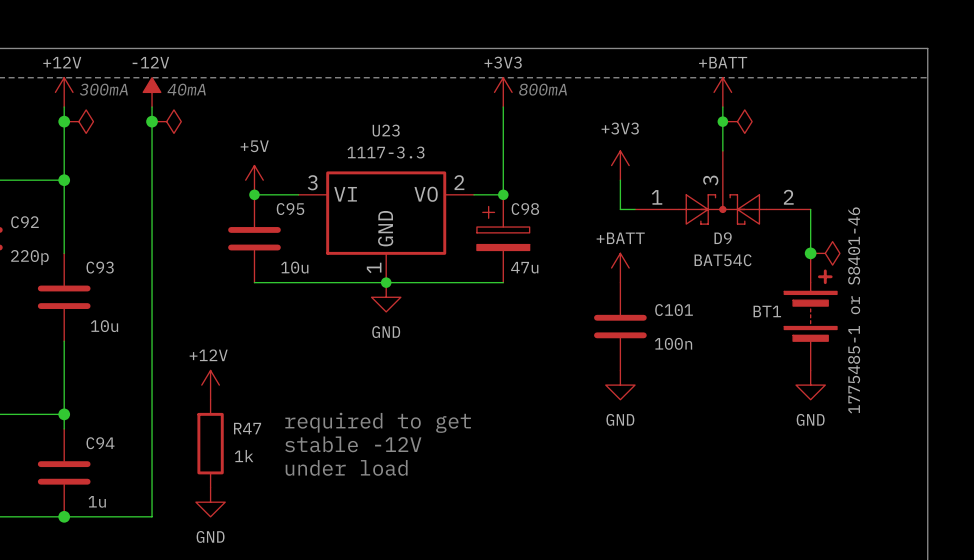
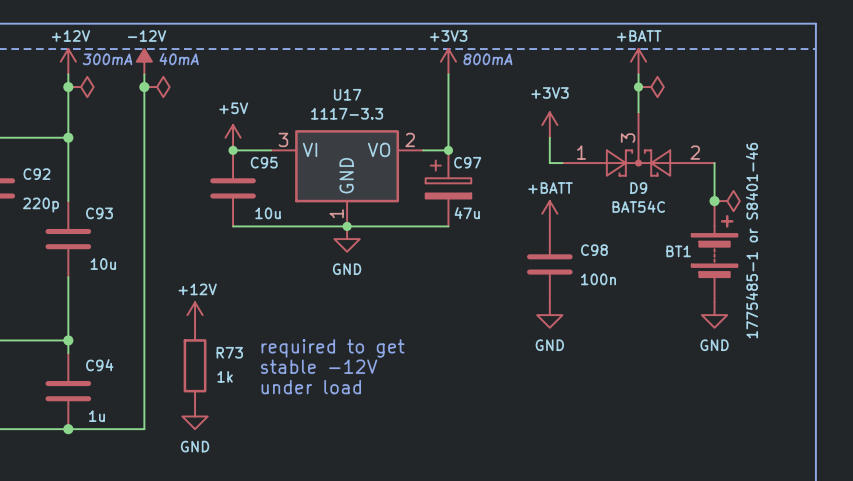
U23 name: U23 (386, 130) -> U17 (347, 94)
C98 name: C98 (525, 209) -> C97 (467, 162)
C101 name: C101 (674, 310) -> C98 (594, 250)
R47 name: R47 (247, 428) -> R73 (229, 352)

